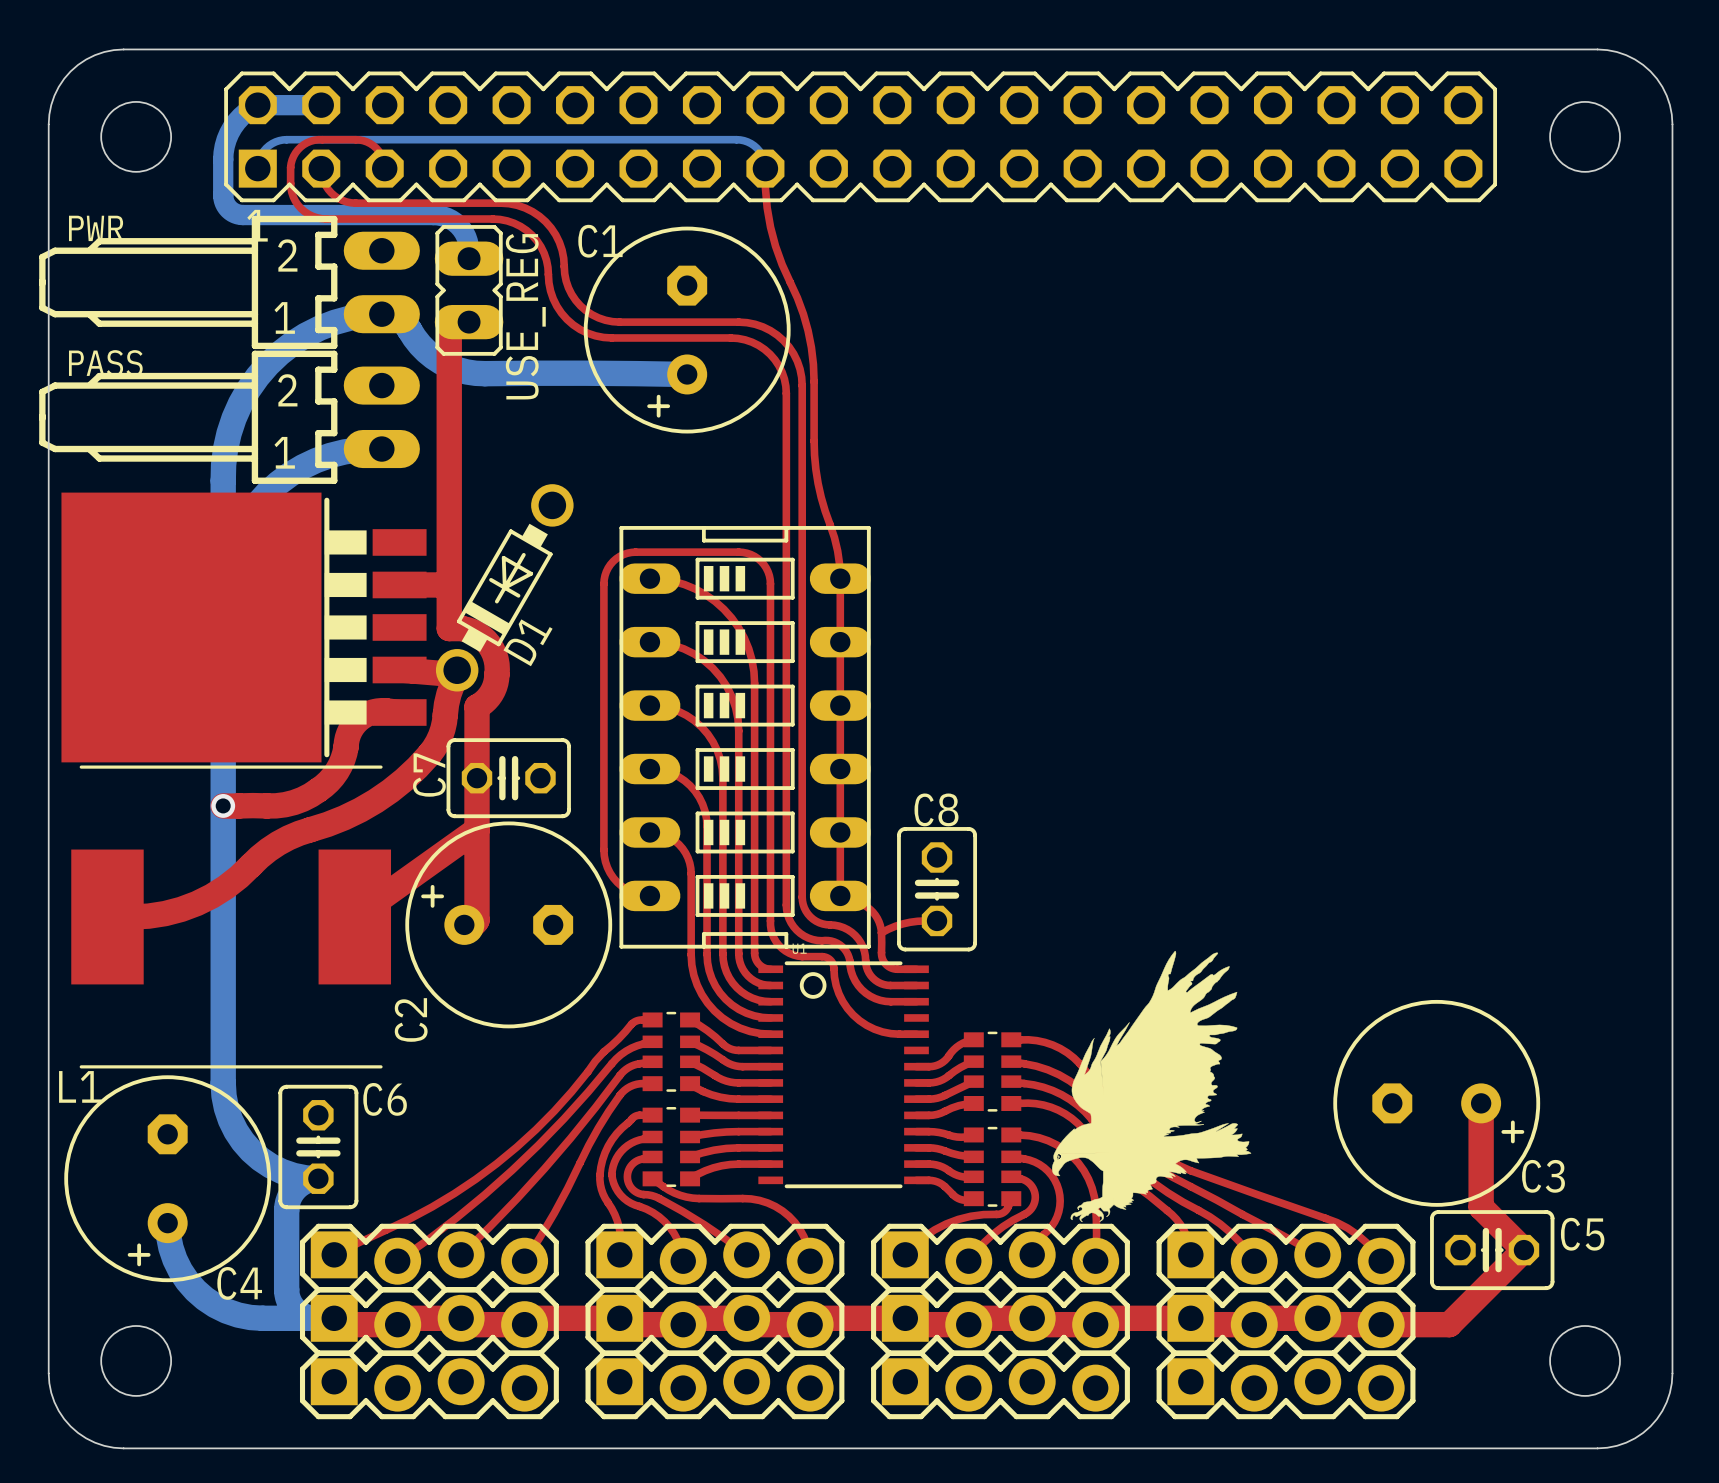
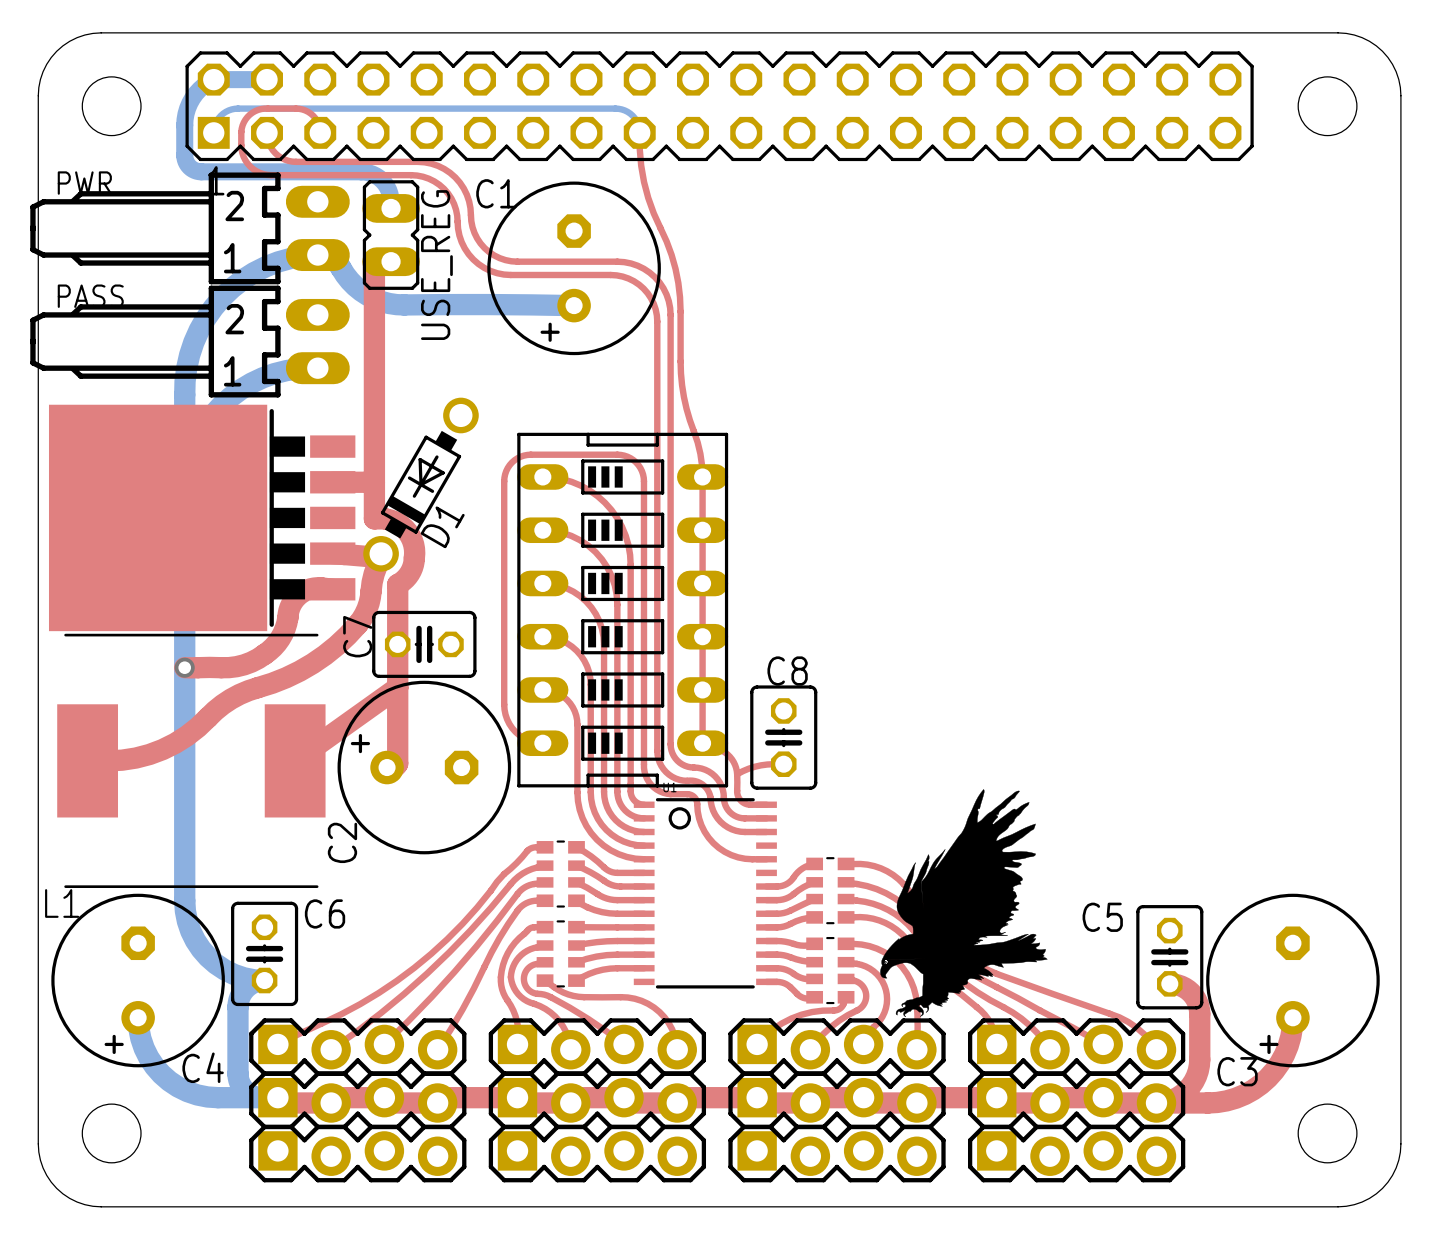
C3 rotation: 0° (1436, 1103) -> 90° clockwise (1292, 980)
C3 position: (1436, 1103) -> (1292, 980)
top track: (1481, 1103) (1481, 1207) (1523, 1250) (1449, 1324) (1442, 1324) -> (1292, 1017) (1288, 1045) (1279, 1063) (1267, 1078) (1244, 1094) (1226, 1100) (1207, 1103)
top track: none -> (1169, 983) (1181, 986) (1188, 990) (1197, 1002) (1199, 1013) (1199, 1065) (1193, 1081) (1182, 1094) (1173, 1099) (1156, 1103)
C5 name position: C5 (1582, 1234) -> C5 (1102, 917)
C5 rotation: 0° (1492, 1250) -> 90° clockwise (1169, 957)
C5 position: (1492, 1250) -> (1169, 957)

